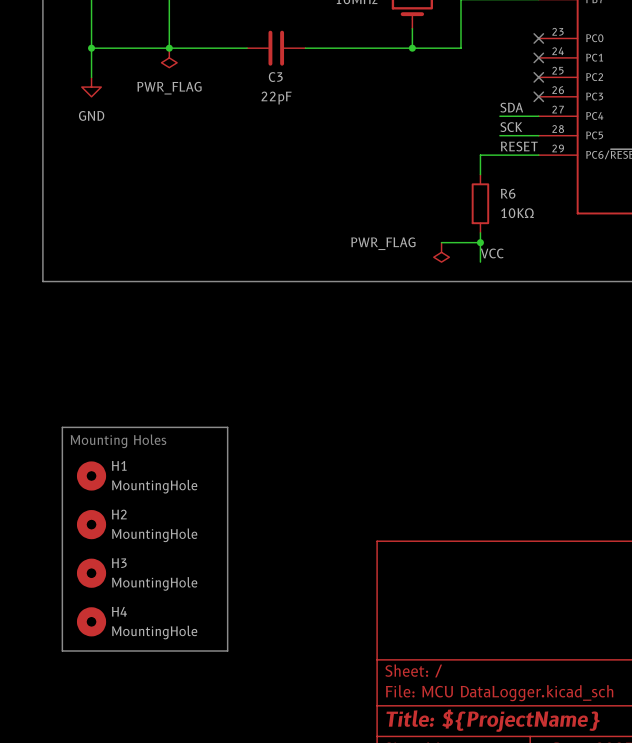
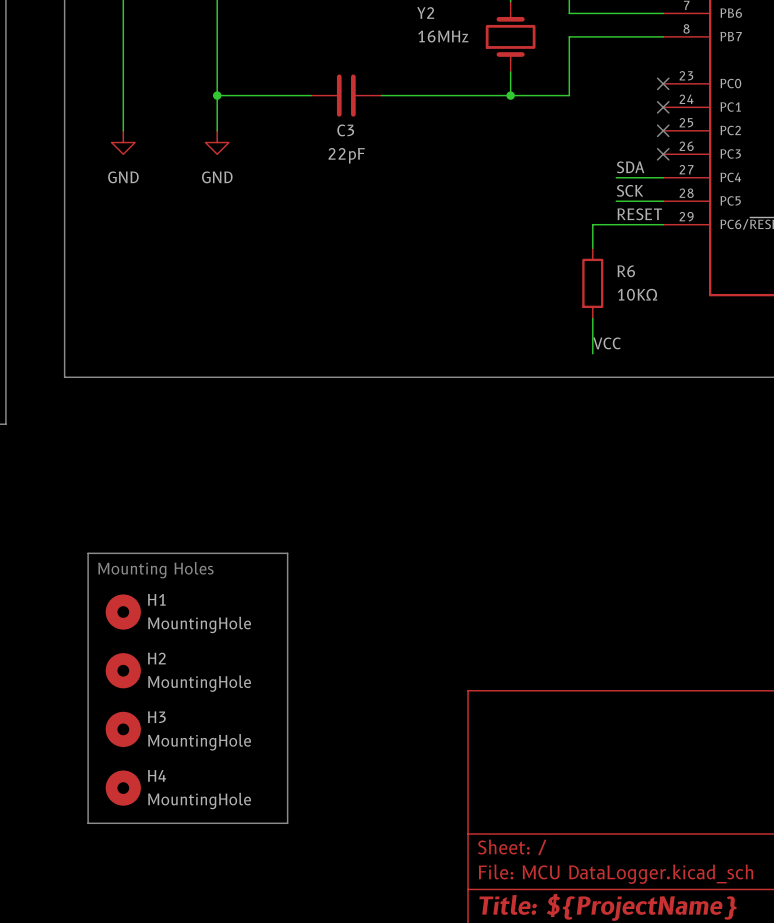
wire: (91, 48) (169, 48) -> (217, 130) (217, 95)
junction: (91, 48) -> none
power symbol: PWR_FLAG (169, 57) -> none
power symbol: none -> GND (217, 142)
wire: (441, 242) (480, 242) -> none
junction: (480, 242) -> none
power symbol: PWR_FLAG (441, 252) -> none

